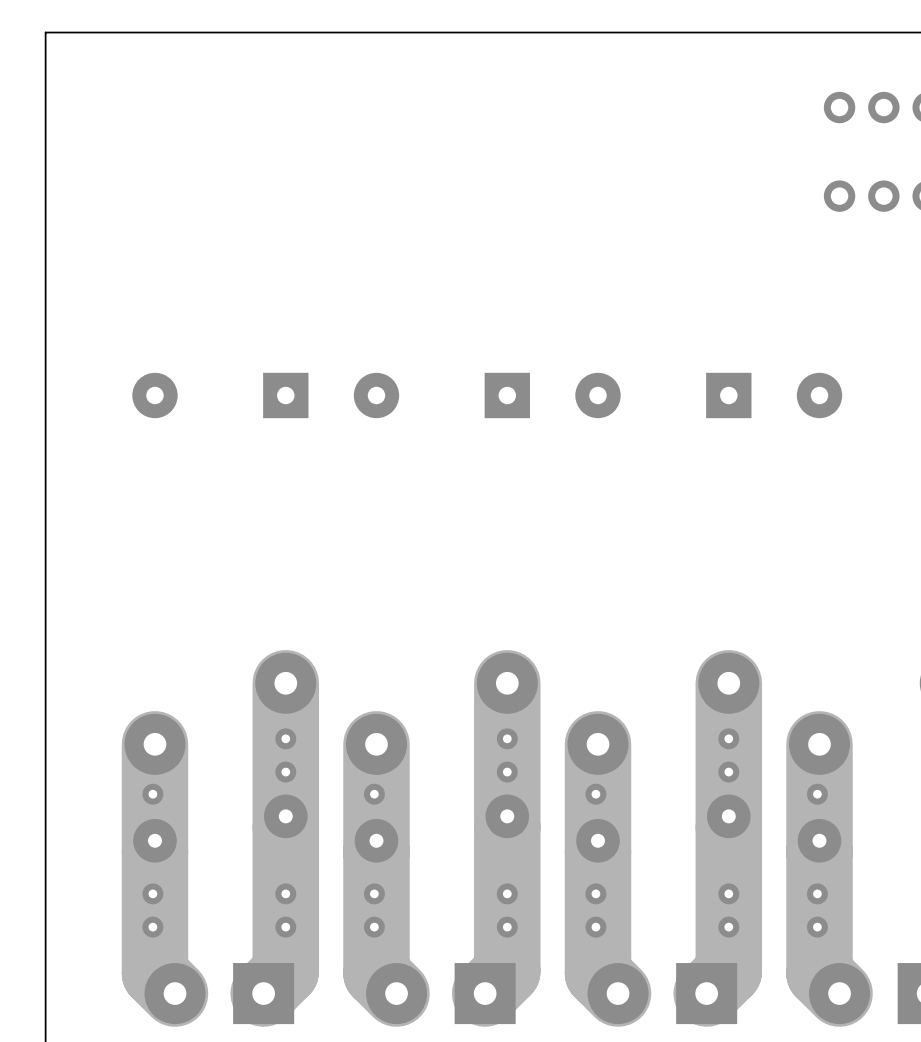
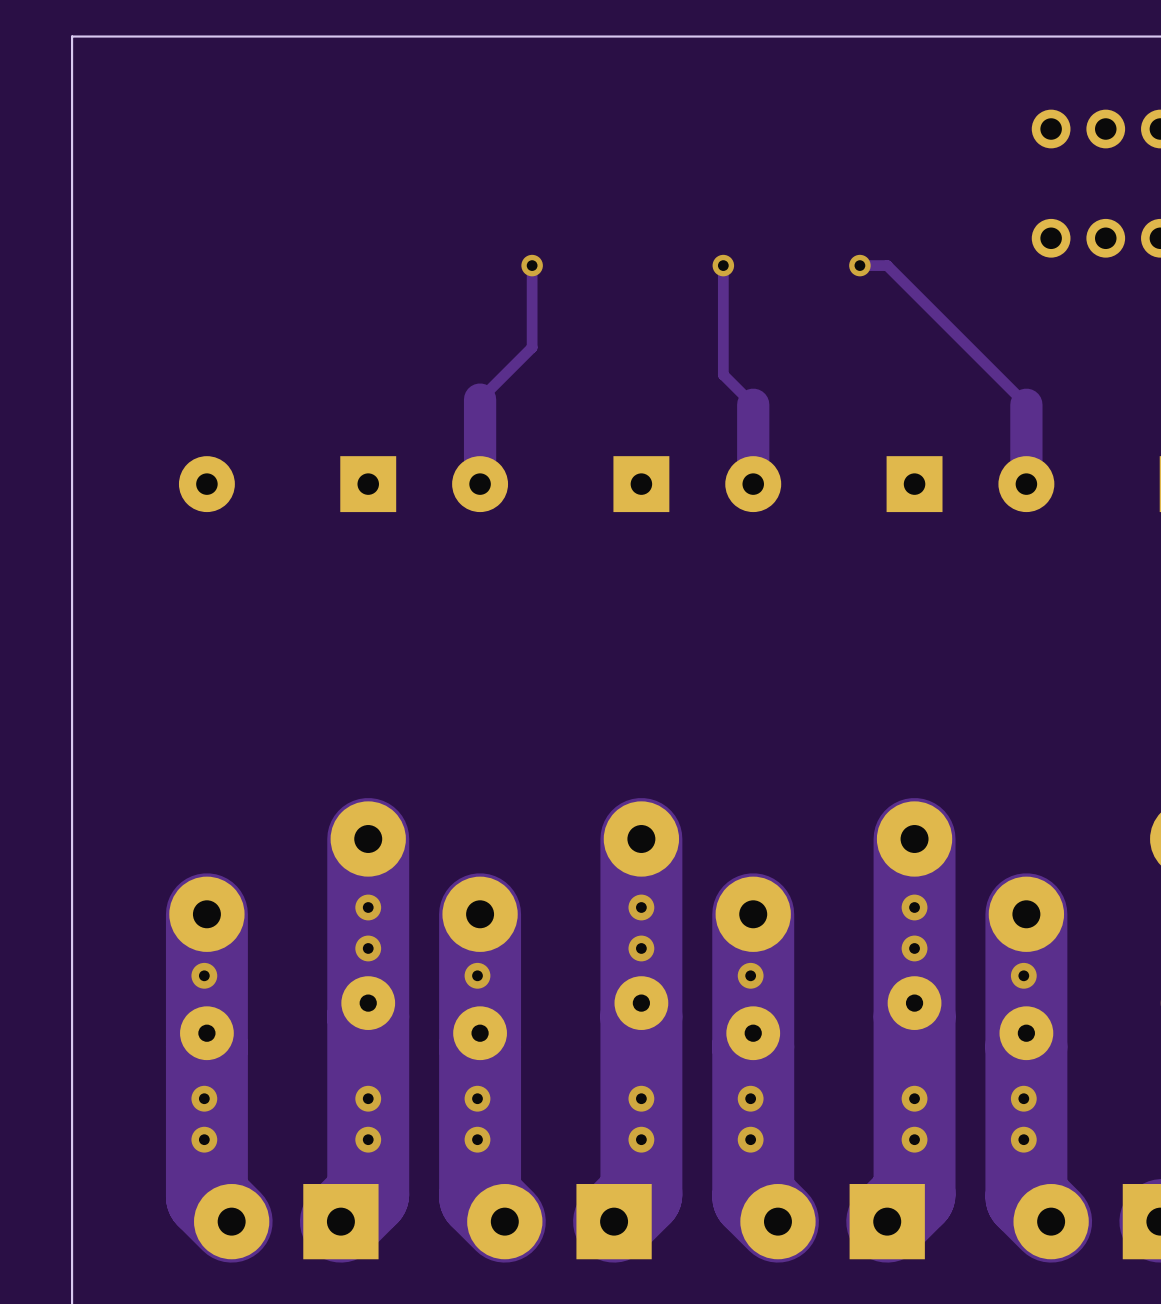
track: none -> (532, 265) (532, 347) (480, 399) (480, 484)
via: none -> (532, 265)
track: none -> (723, 265) (723, 374) (753, 404) (753, 484)
via: none -> (723, 265)
track: none -> (859, 265) (887, 265) (1026, 404) (1026, 484)
via: none -> (859, 265)

